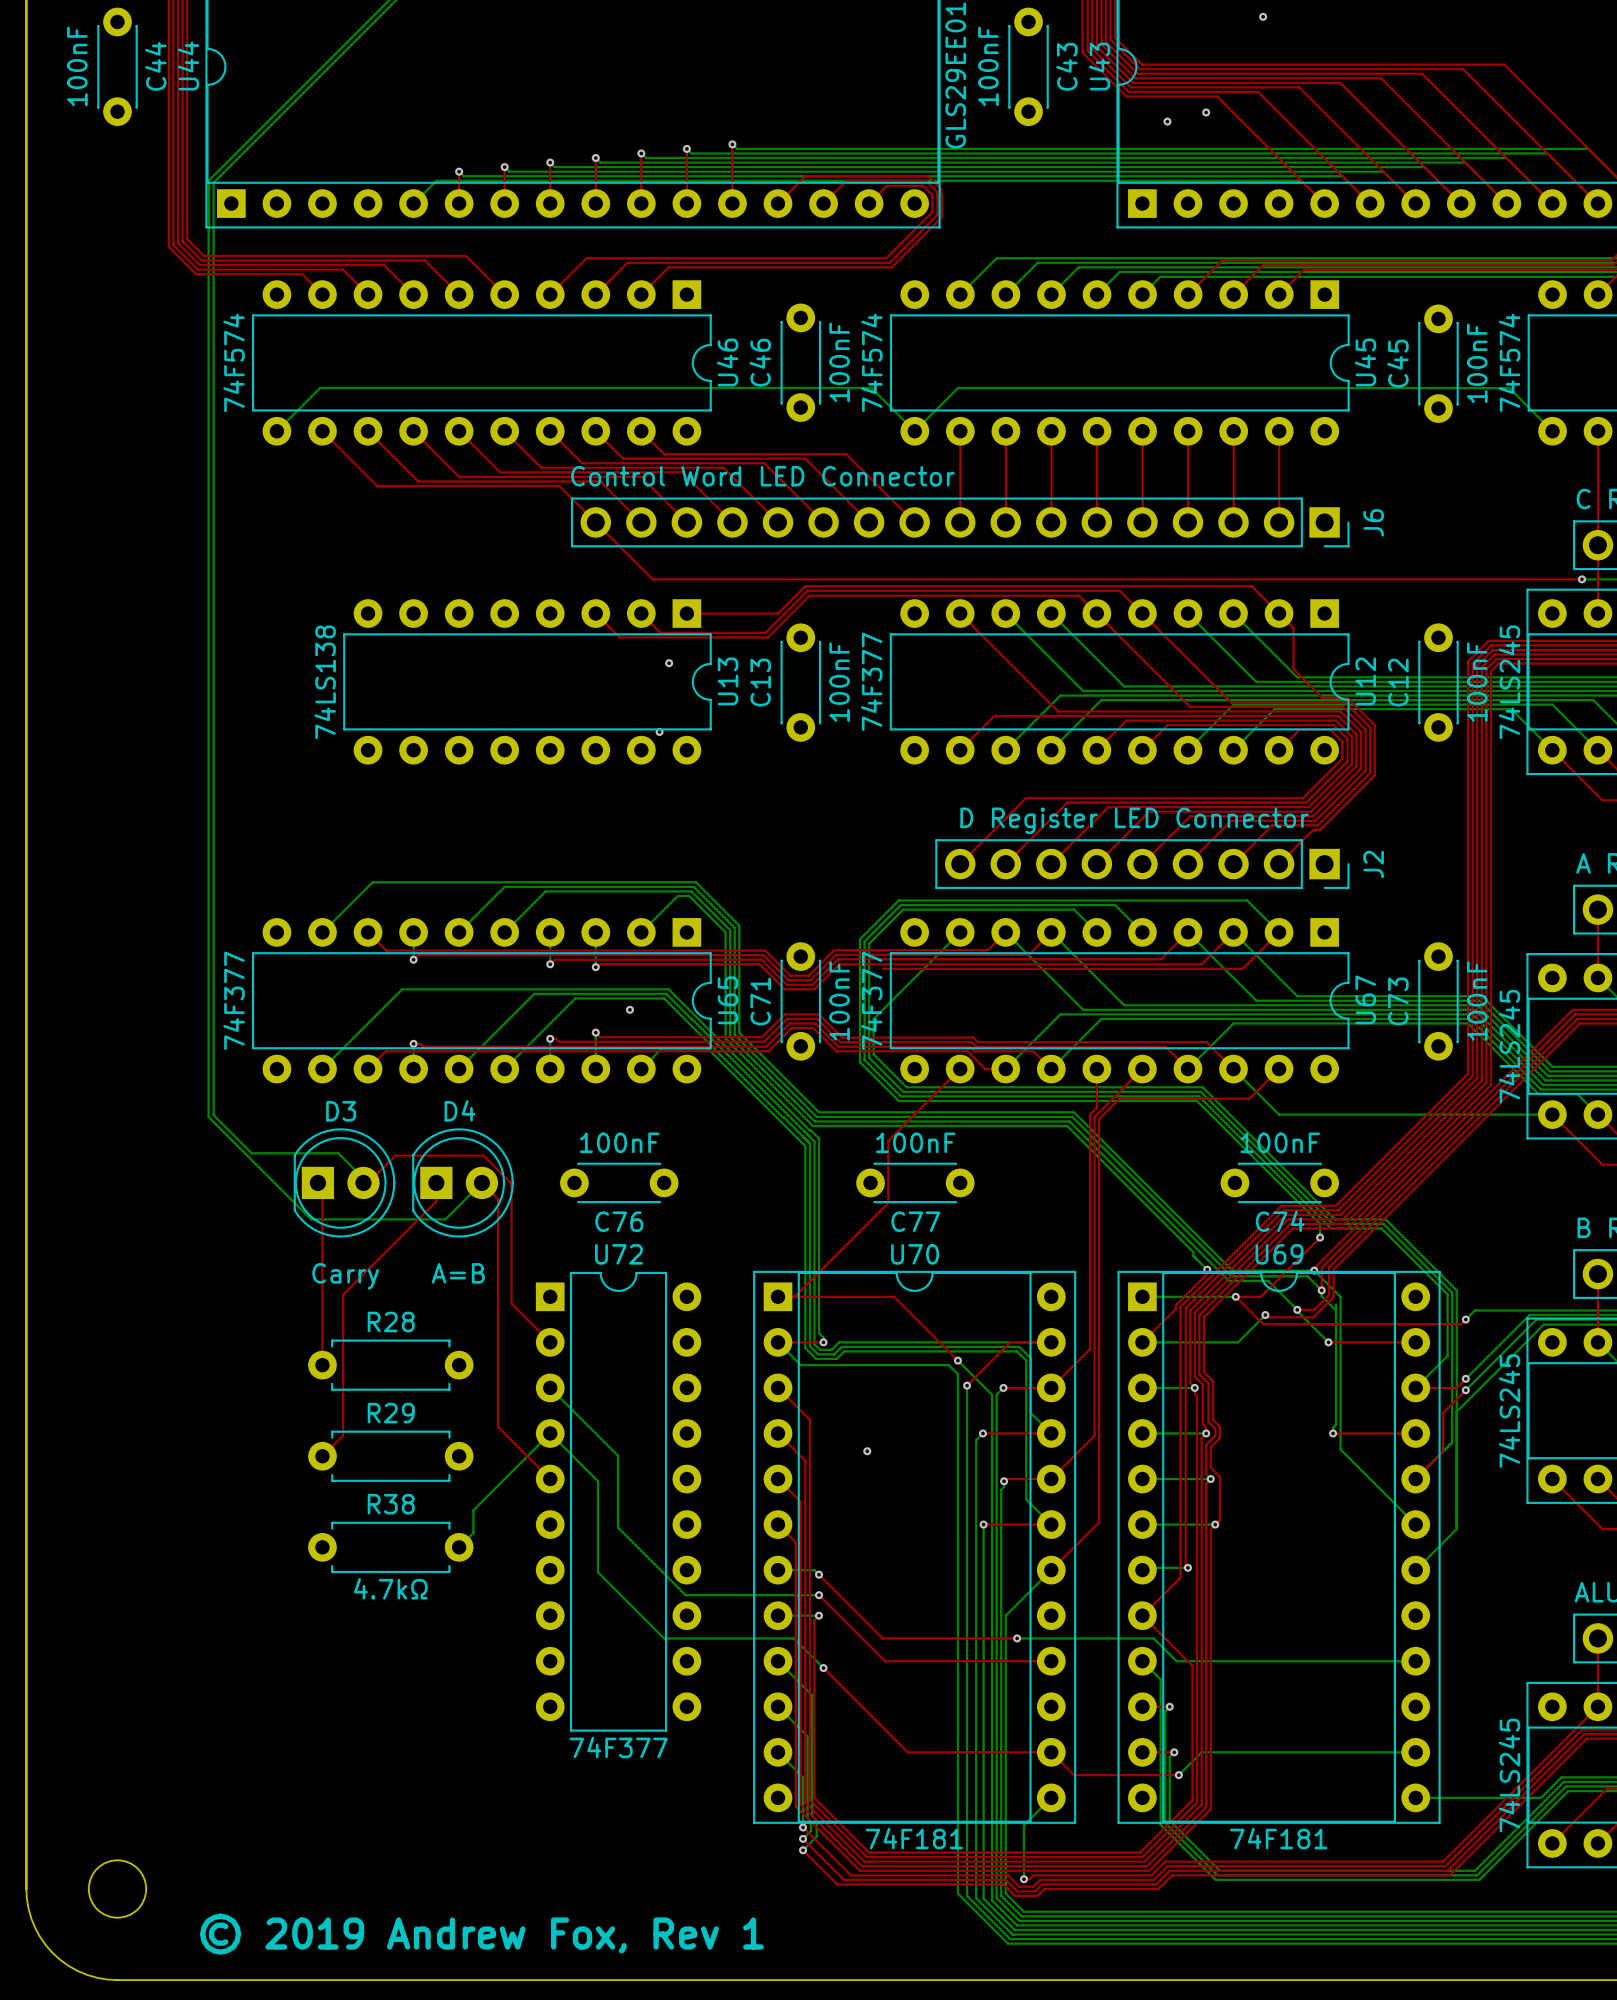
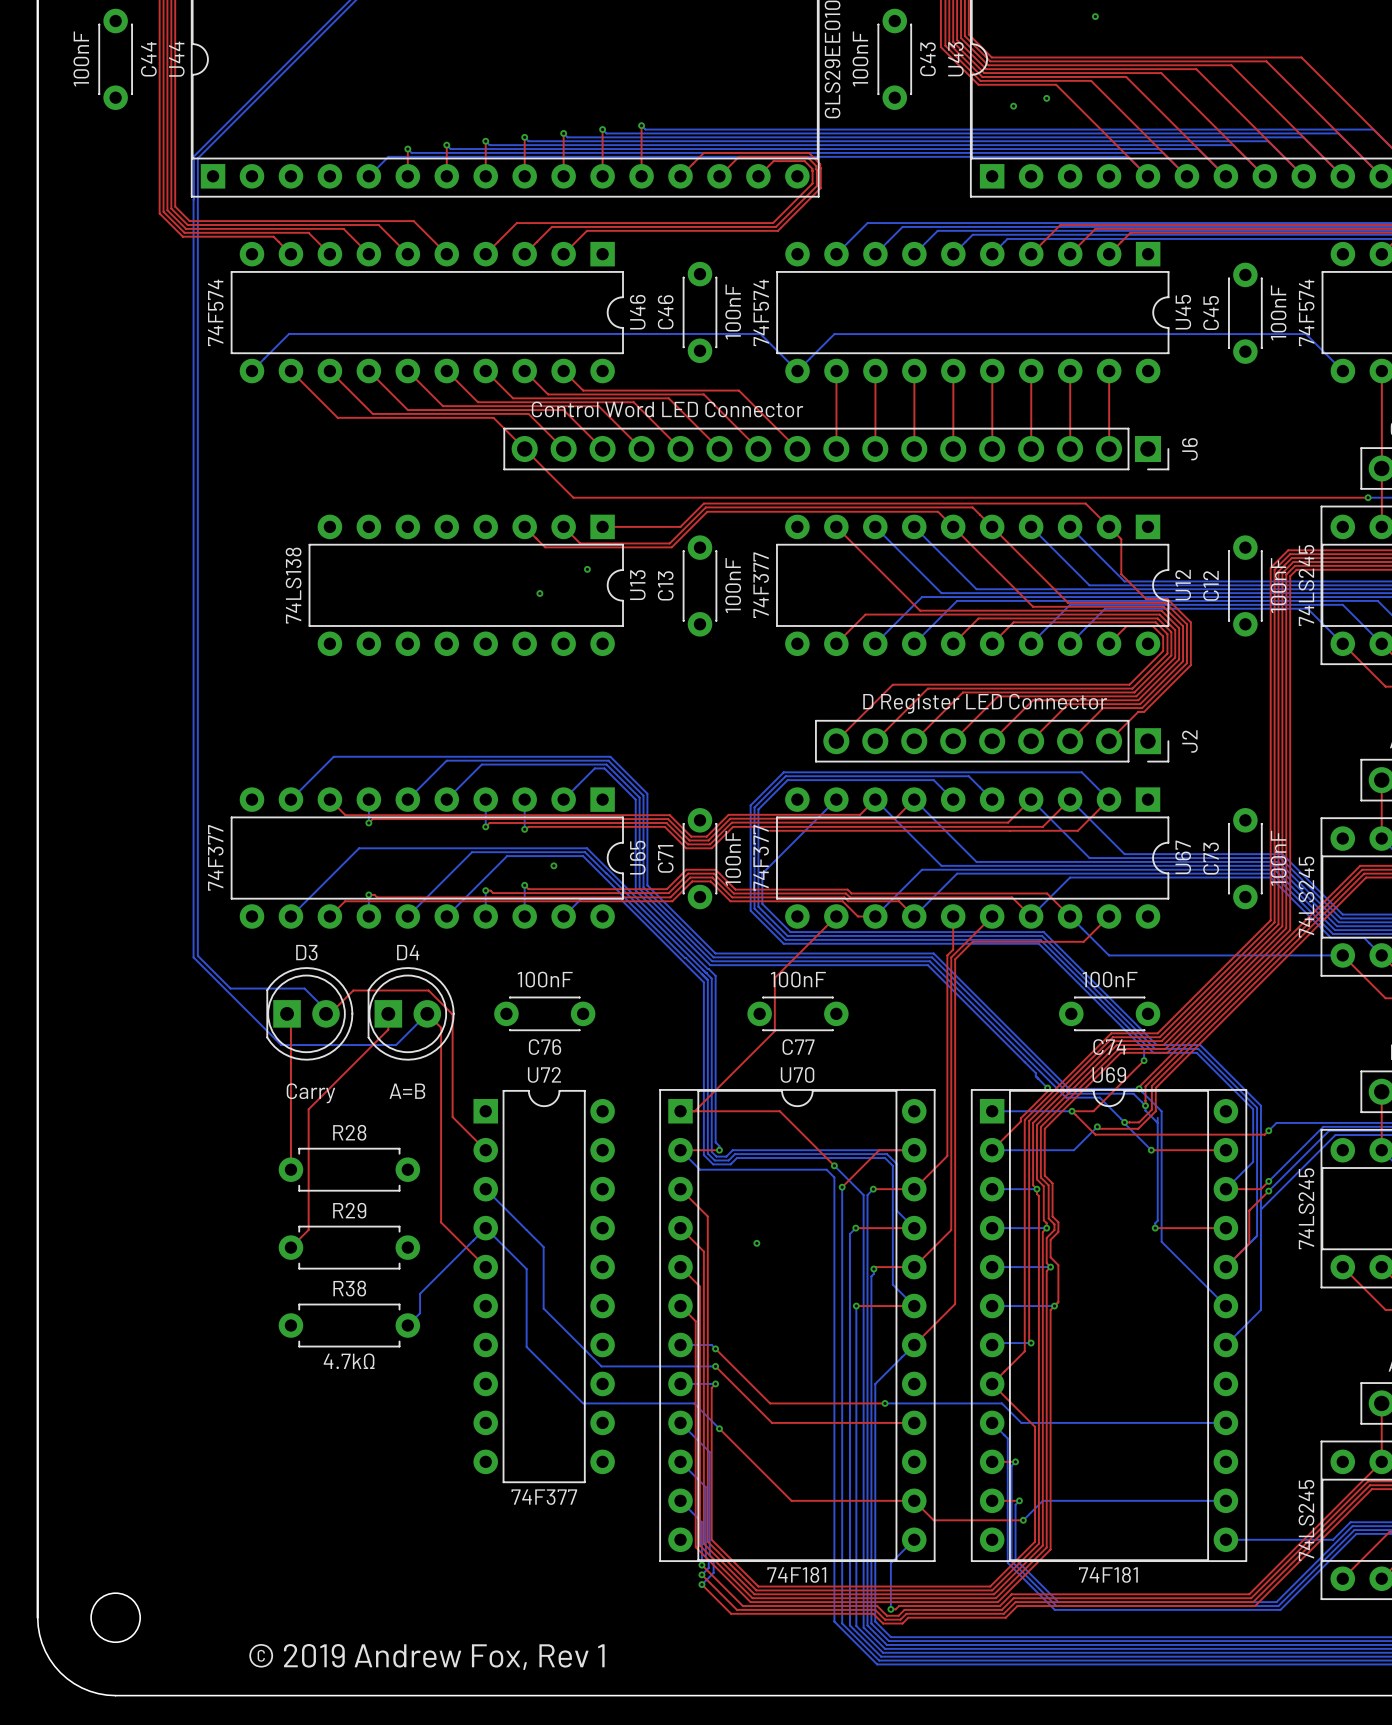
via position: (659, 731) -> (539, 593)

